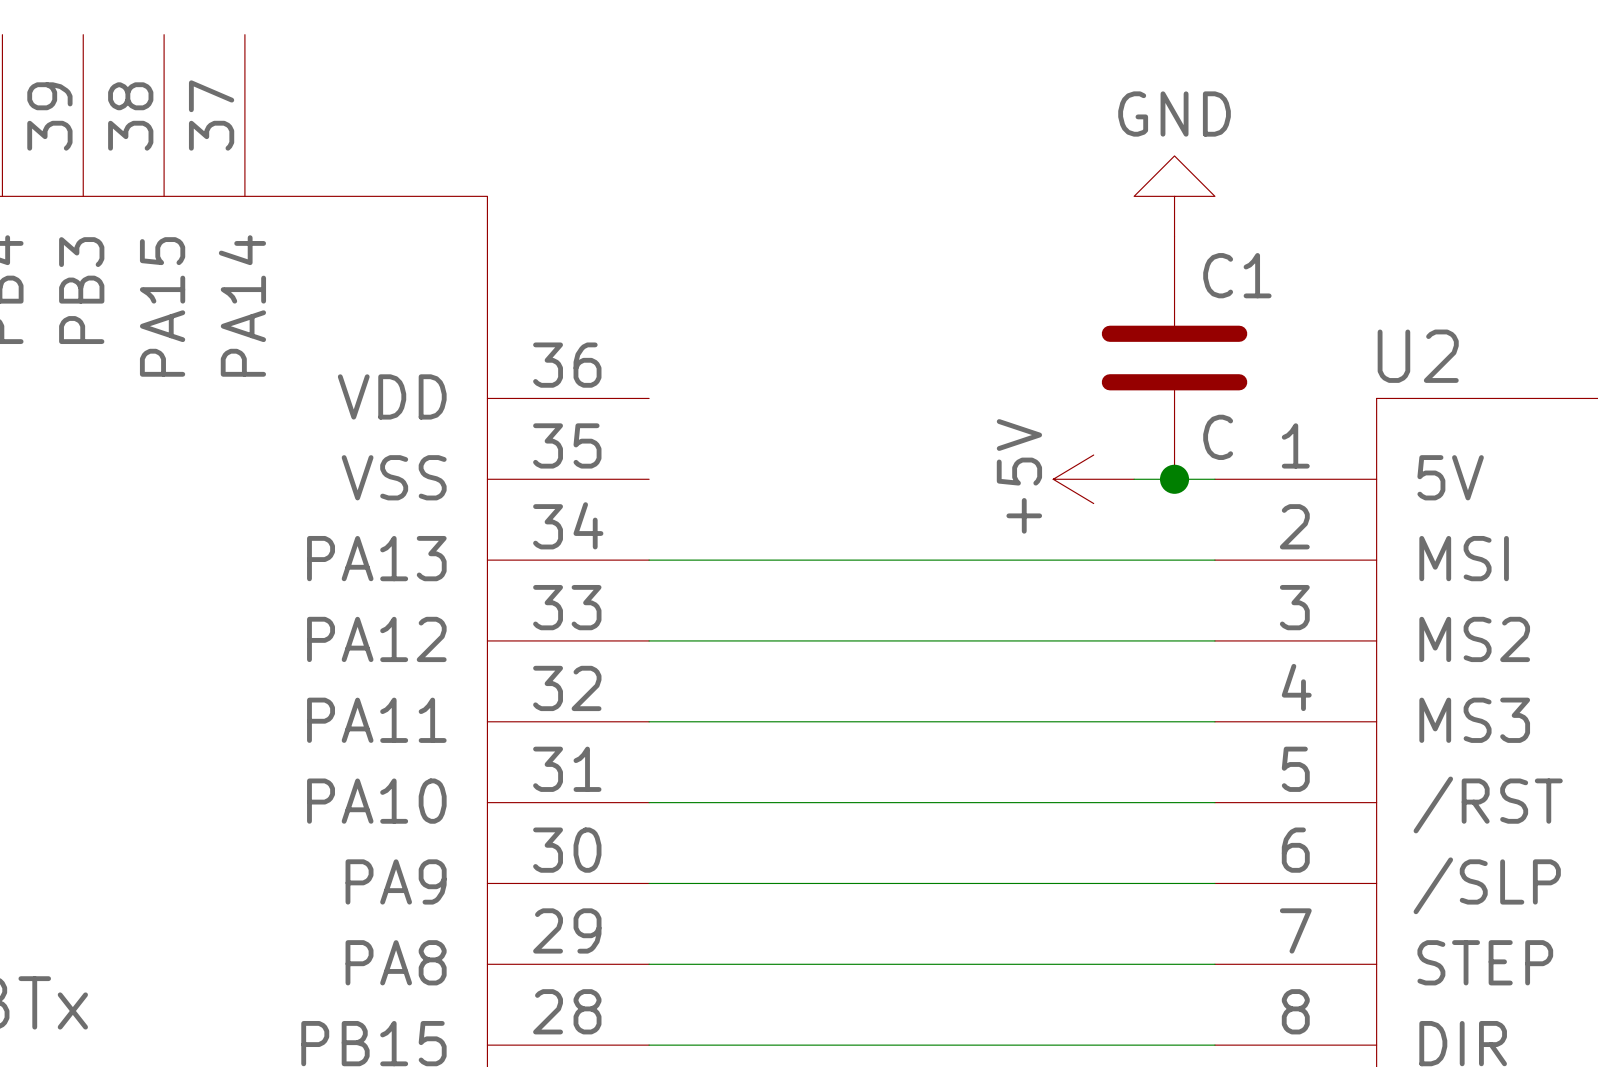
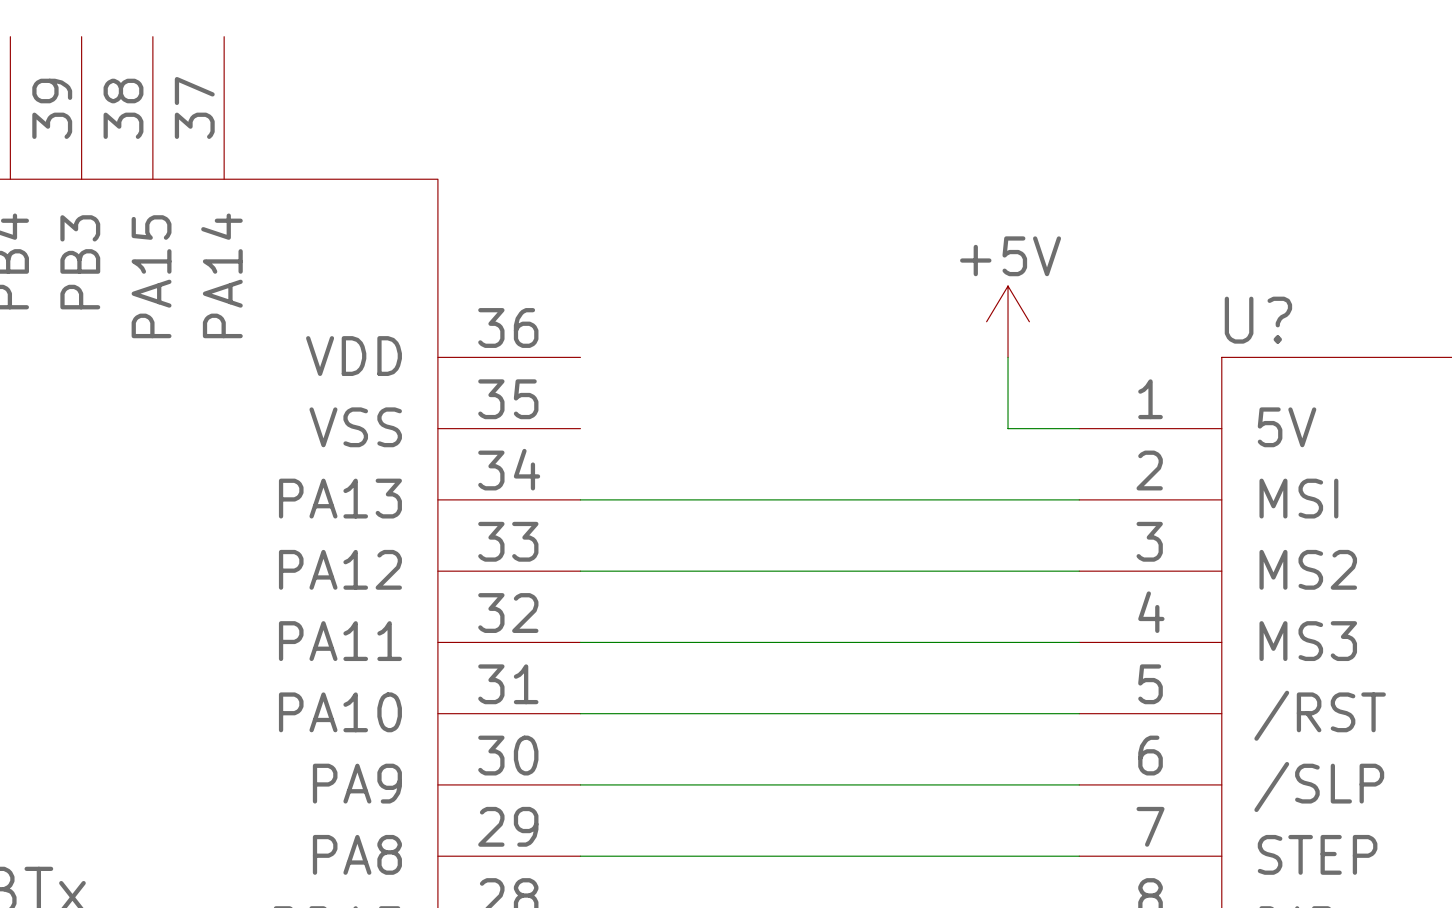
power symbol: GND (1174, 196) -> none
U2 name: U2 (1418, 356) -> U? (1258, 320)
C1: C (1174, 358) -> none
wire: none -> (1008, 357) (1008, 428)
power symbol rotation: 0° (1093, 479) -> 90° clockwise (1008, 321)
power symbol position: +5V (1093, 479) -> +5V (1008, 321)
junction: (1174, 479) -> none

